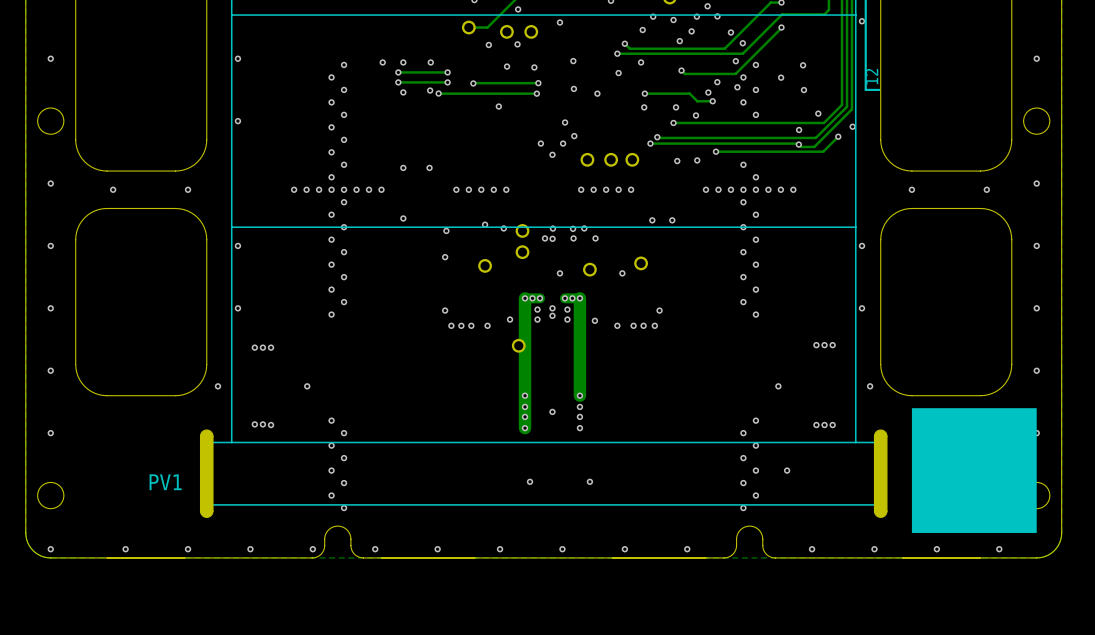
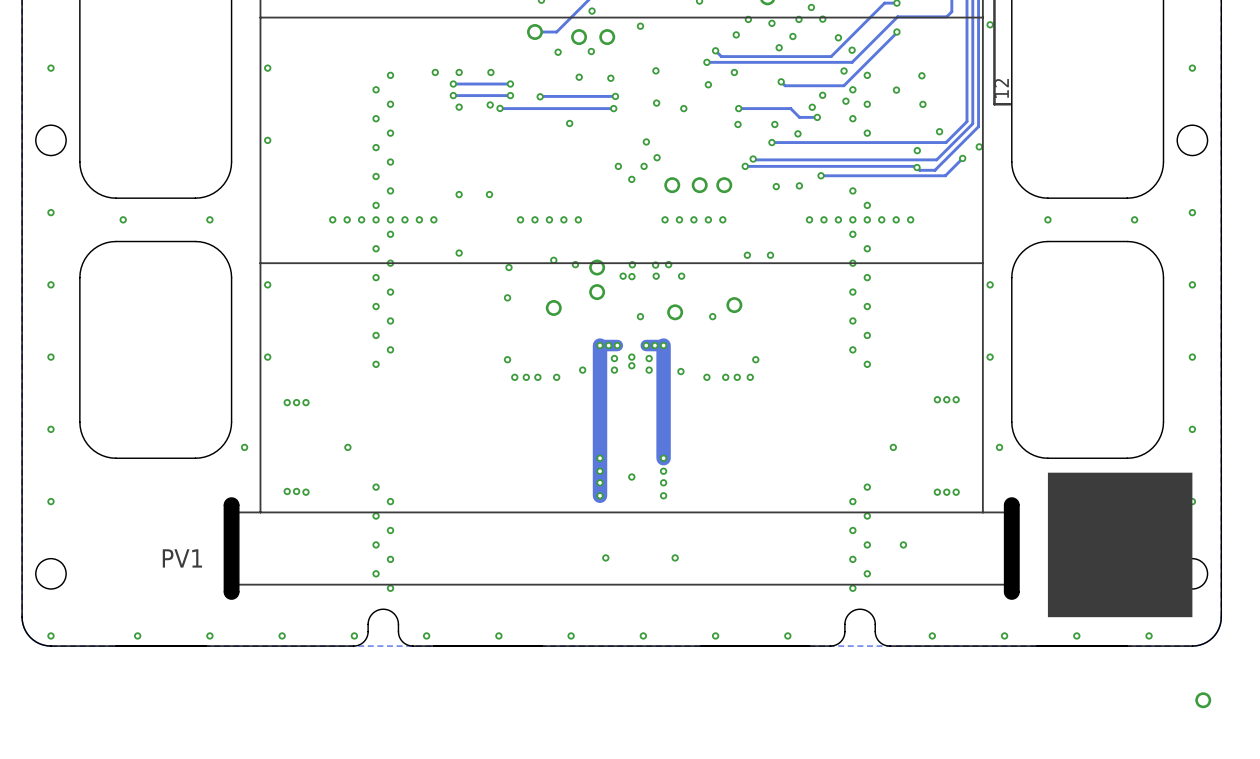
part: (518, 345) -> none
part: none -> (1203, 700)

